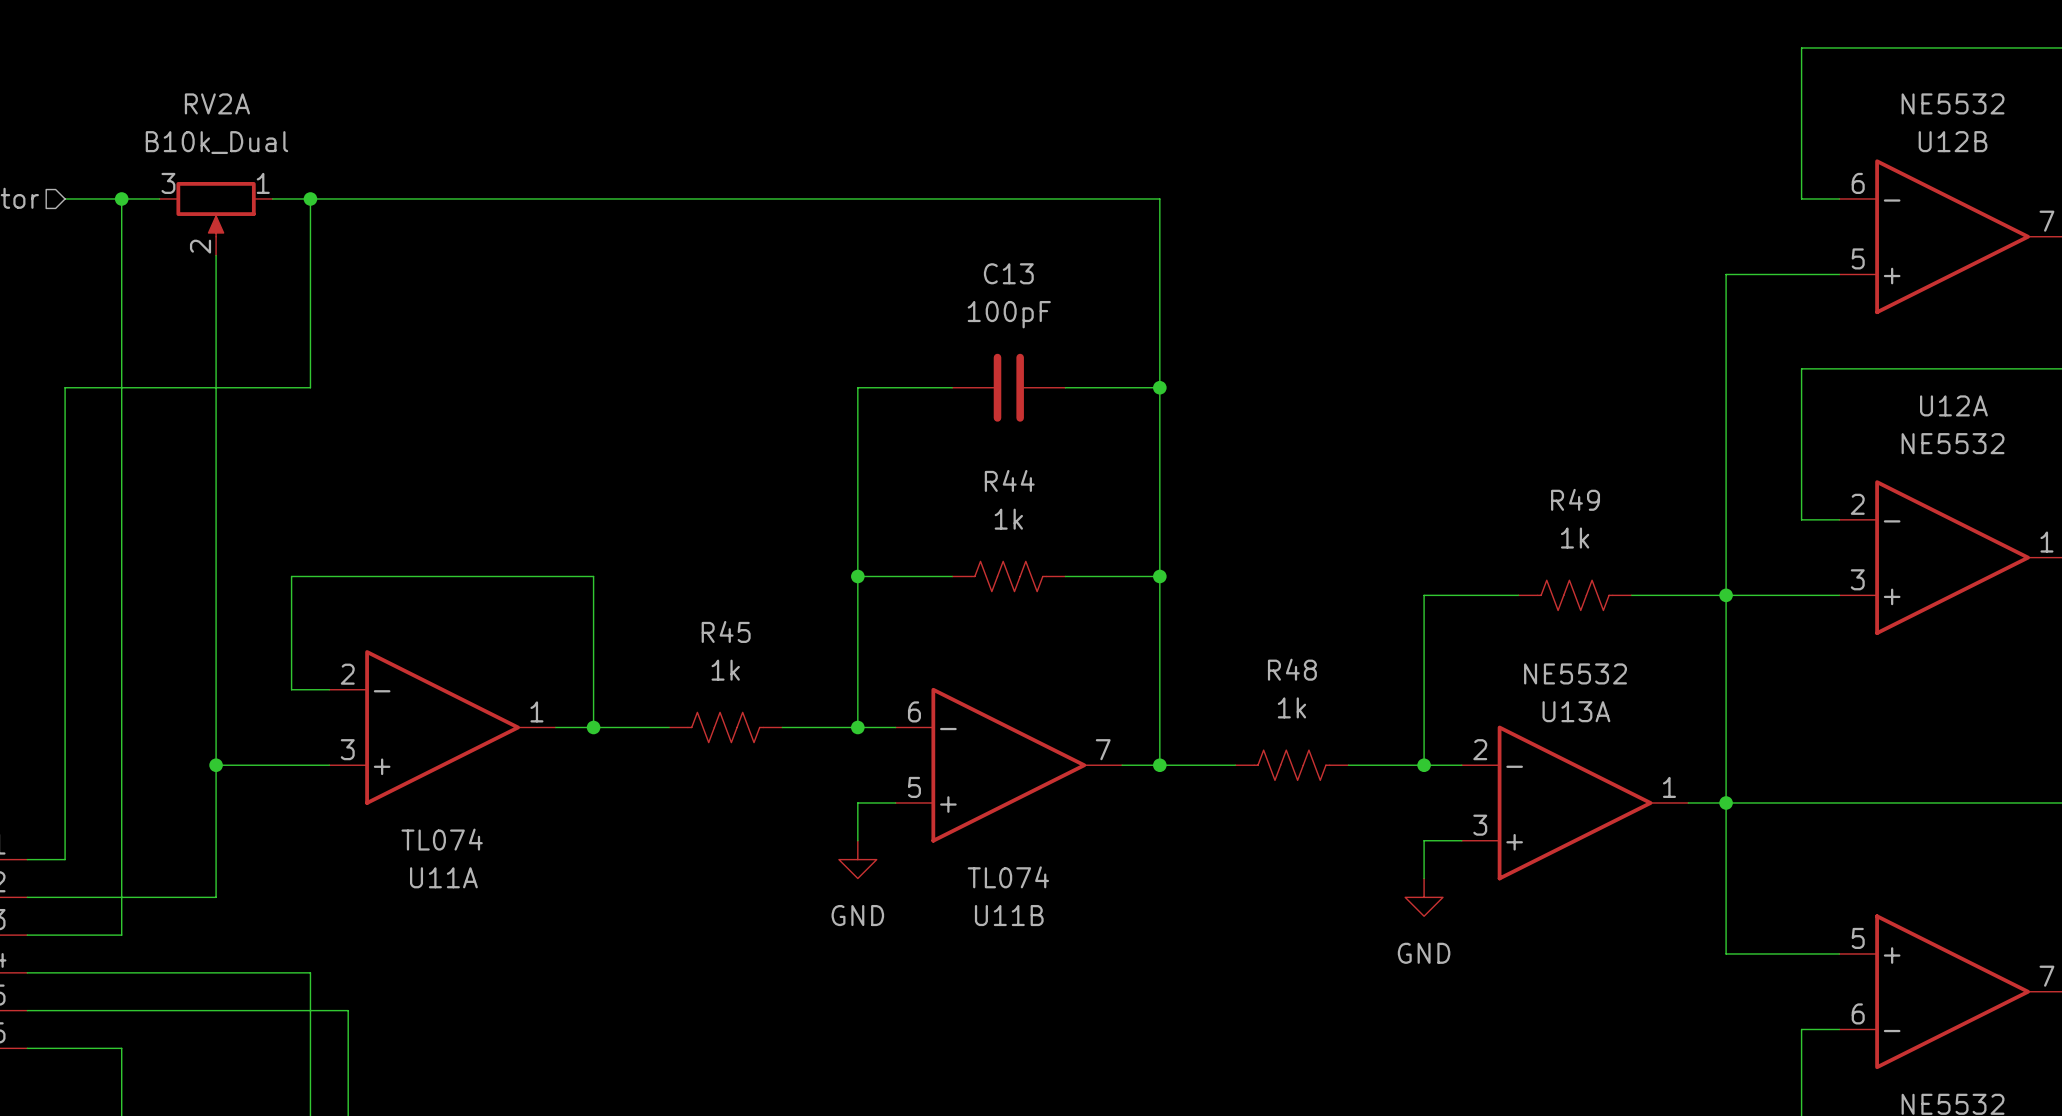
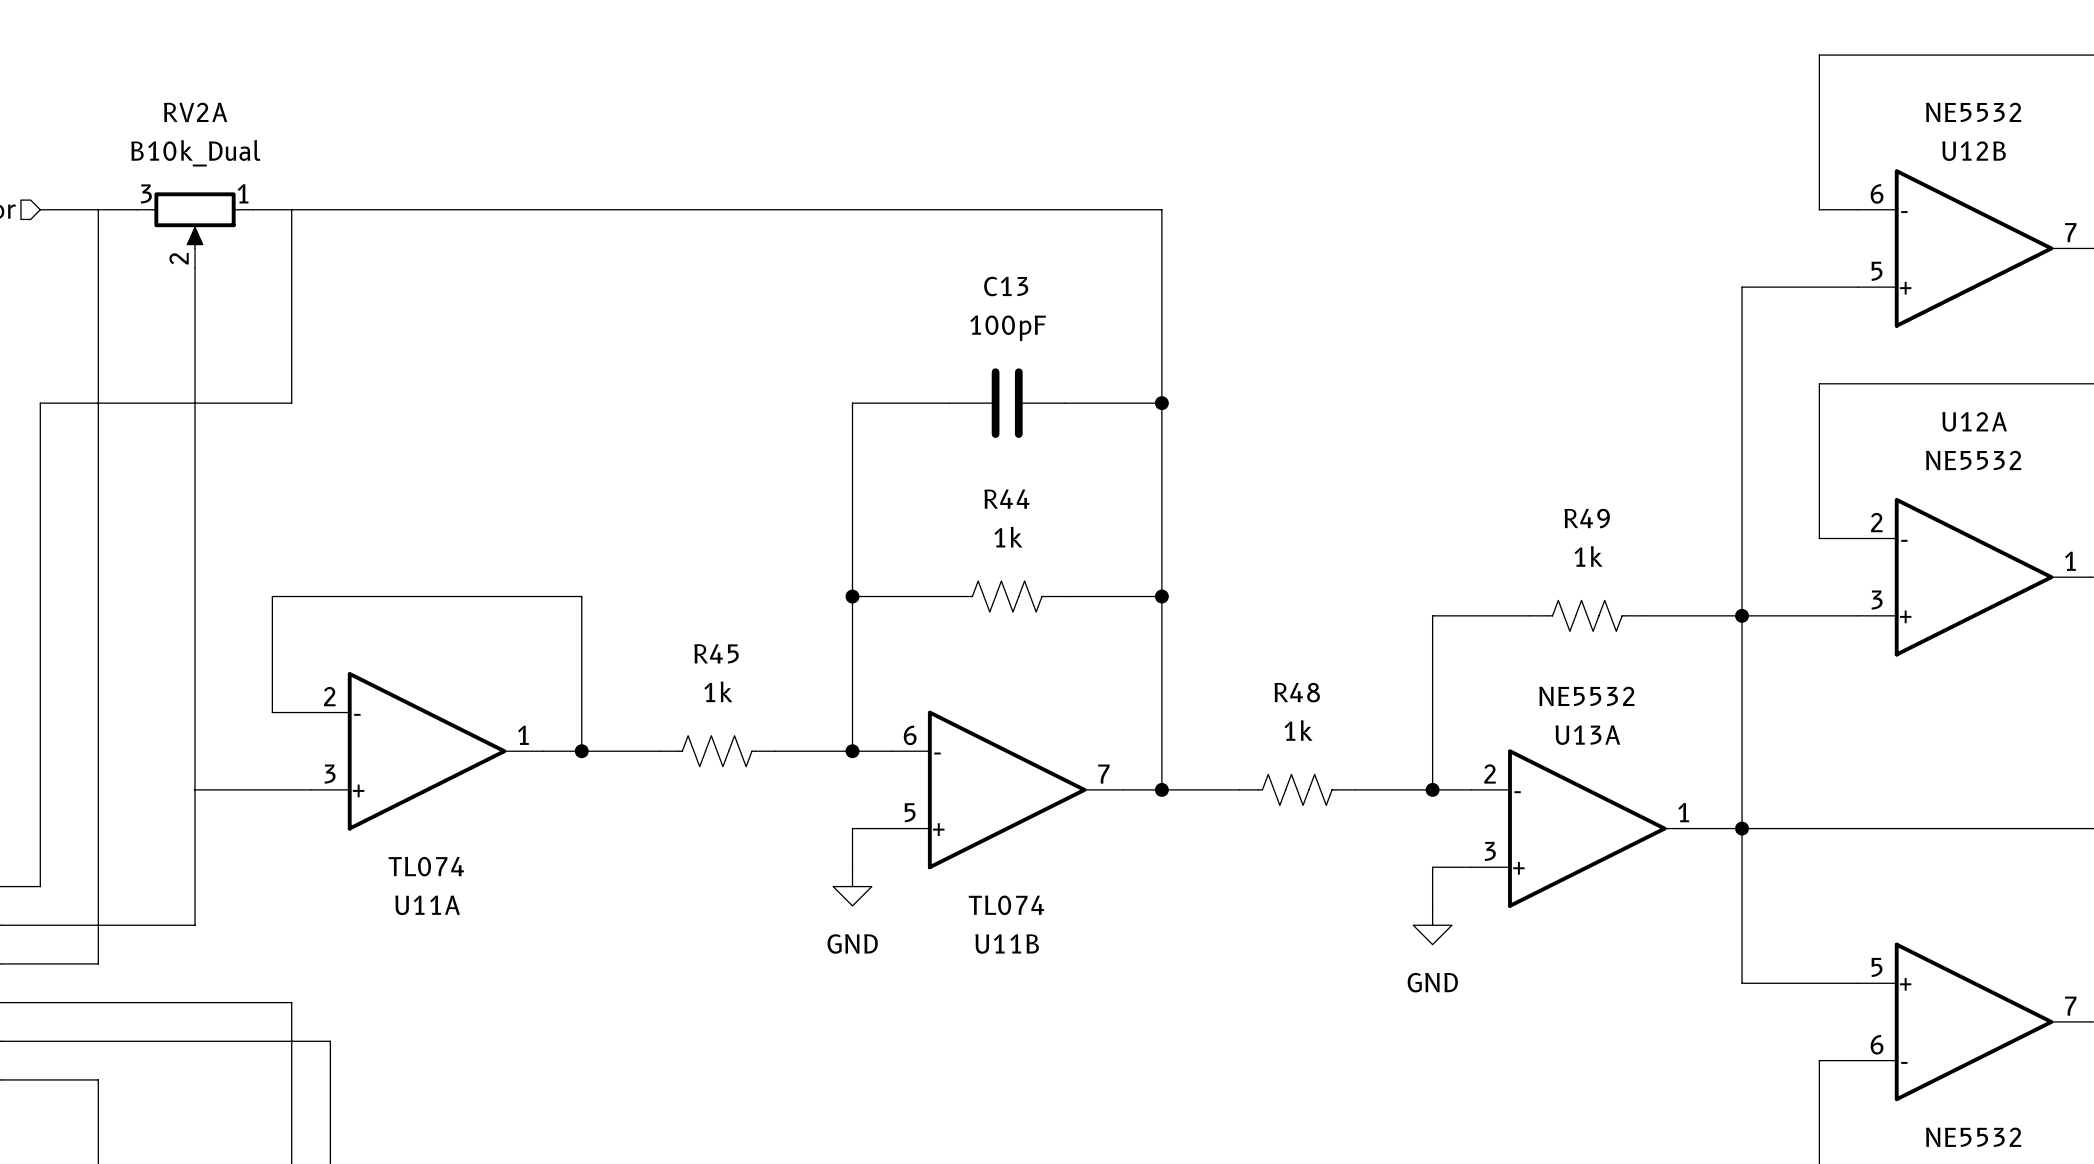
junction: (121, 198) -> none
junction: (310, 198) -> none
junction: (216, 765) -> none

